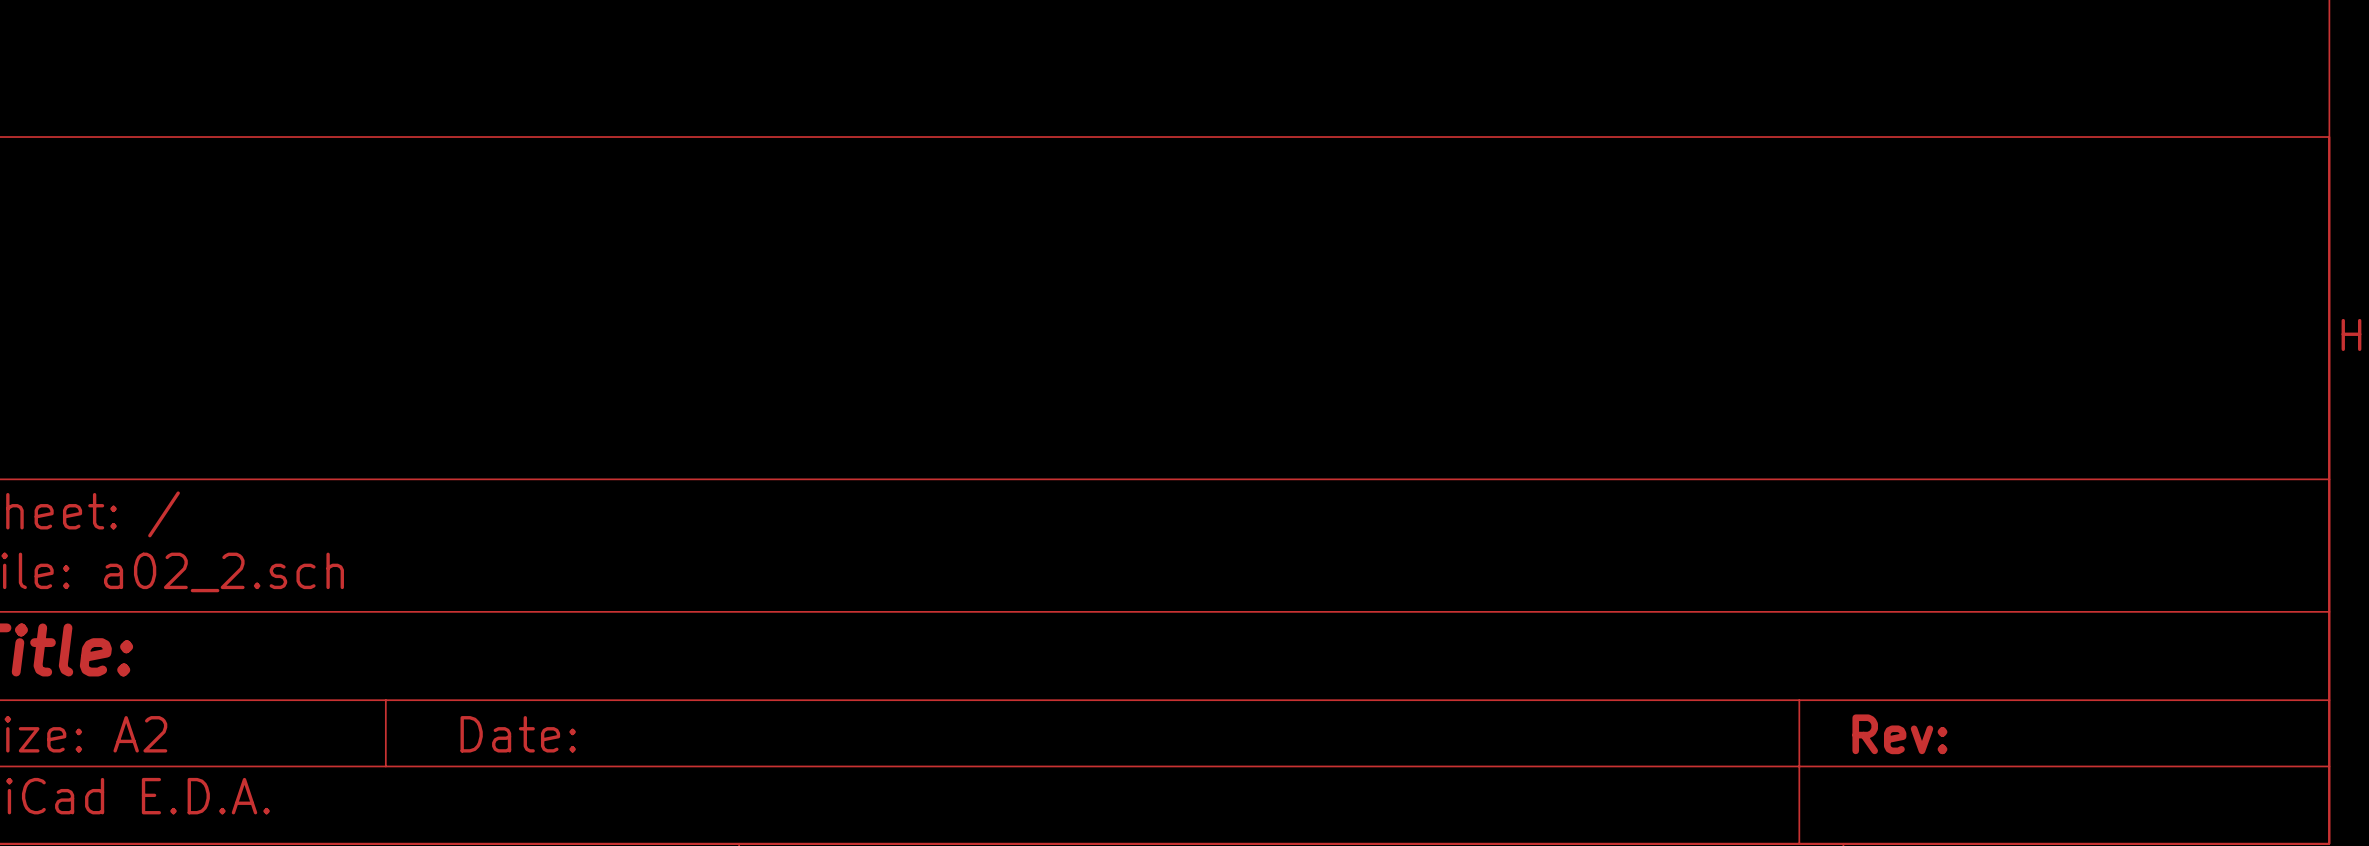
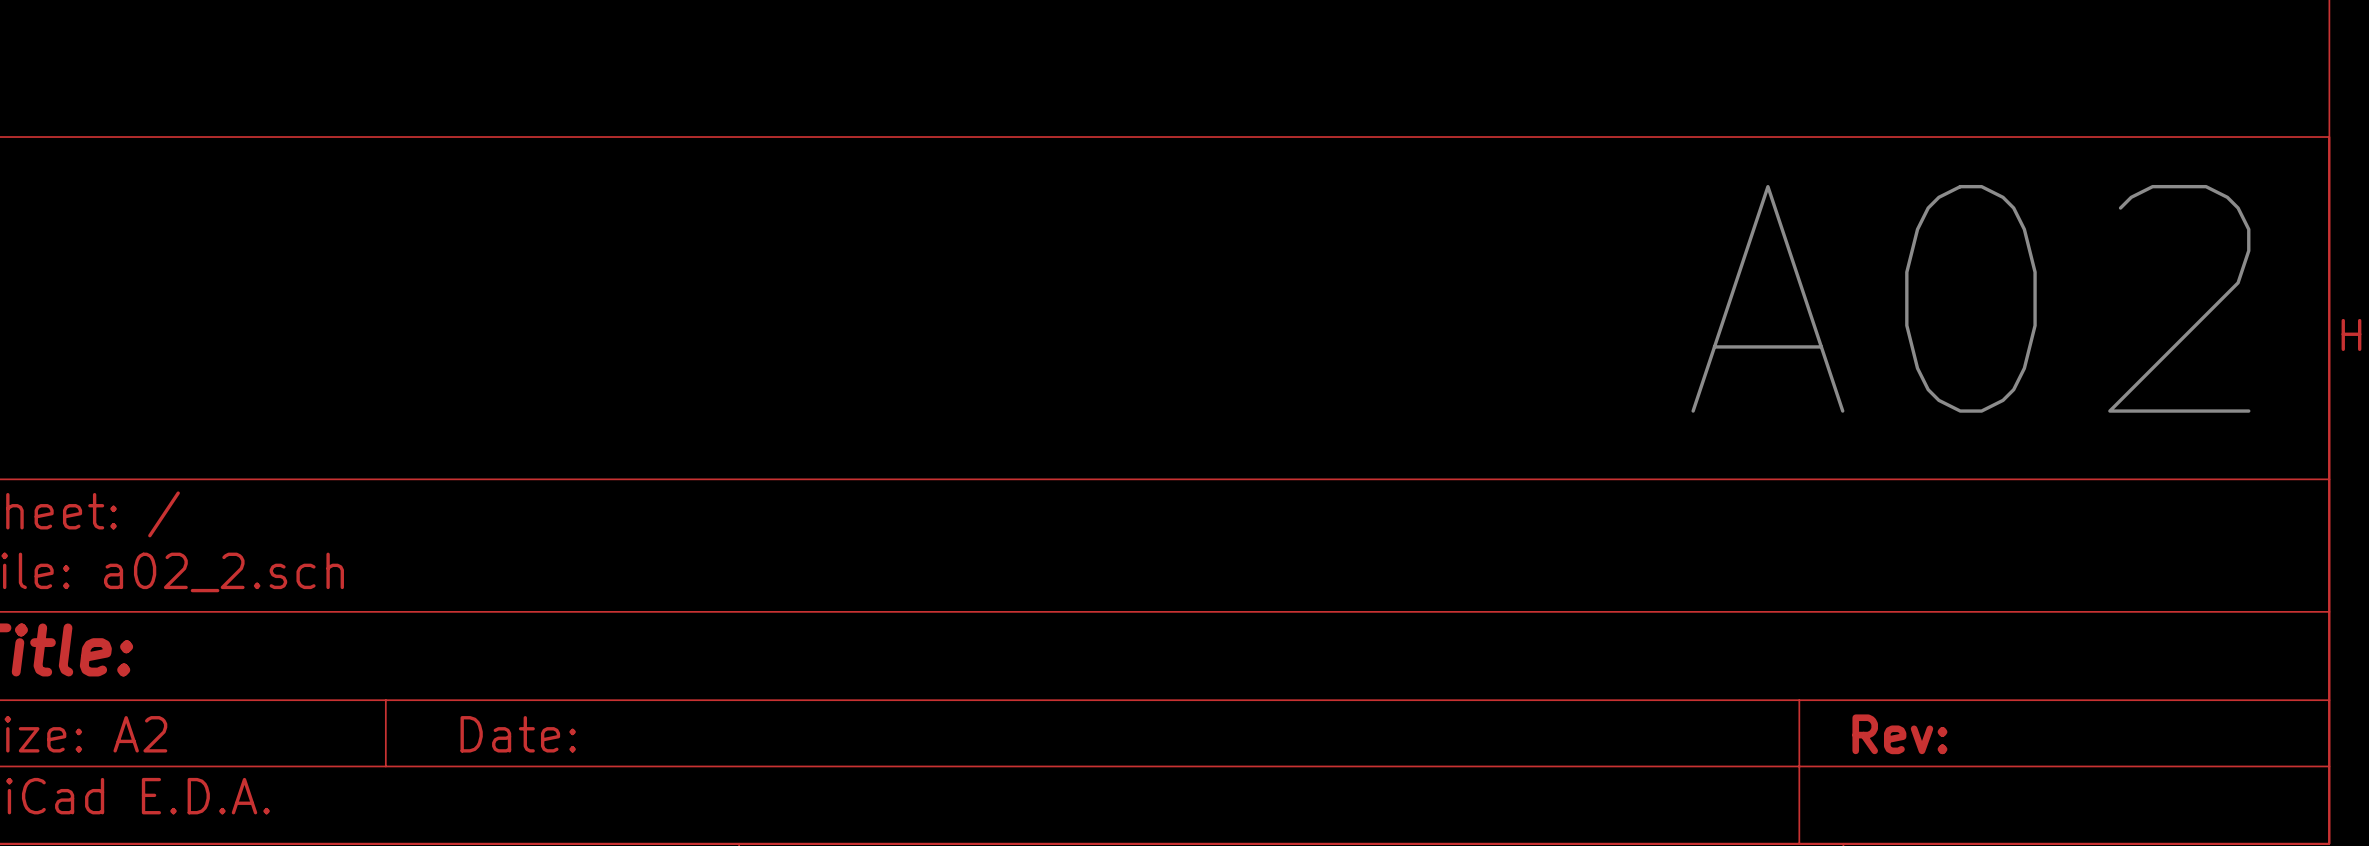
text: none -> A02 (1970, 298)

